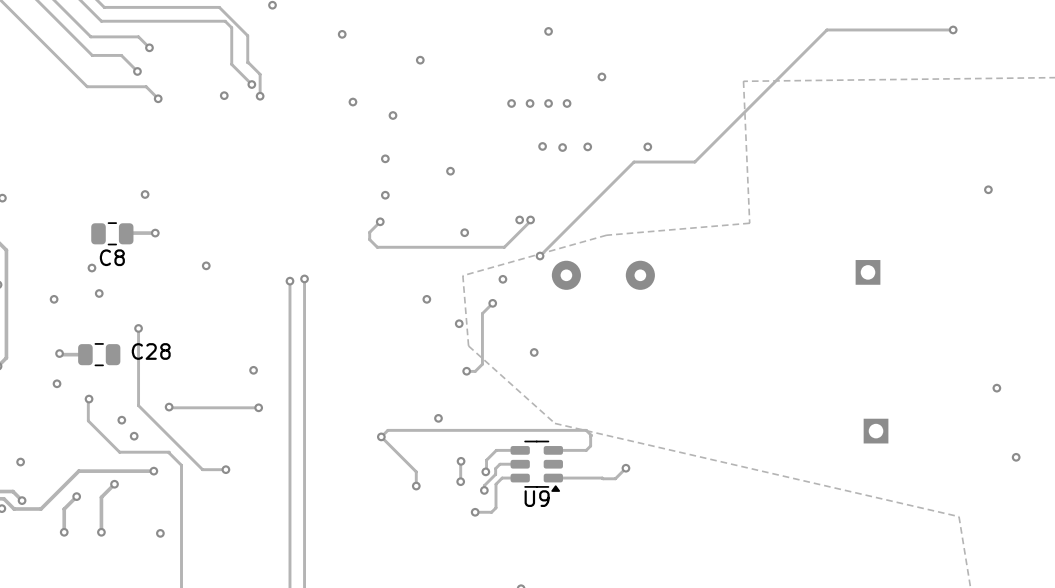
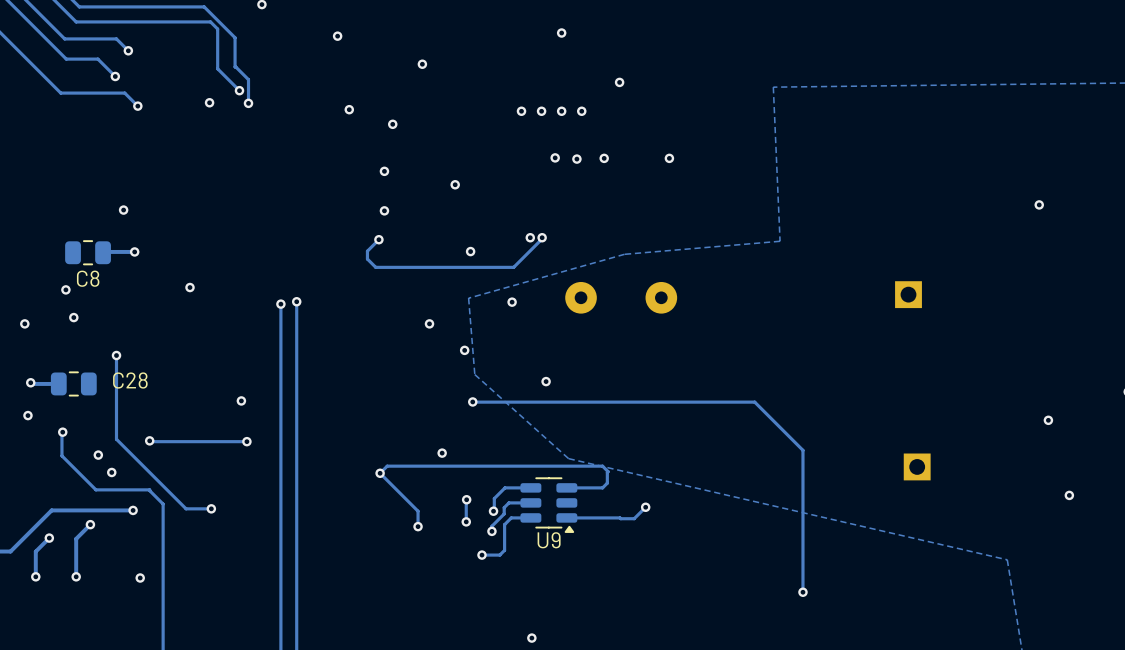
track: (953, 29) (826, 29) (694, 162) (634, 162) (540, 256) -> none
via: (953, 29) -> none
via: (540, 256) -> none
track: (492, 303) (482, 313) (482, 364) (475, 371) -> (802, 592) (802, 450) (754, 402) (482, 402)
via: (492, 303) -> none
via: none -> (802, 592)

